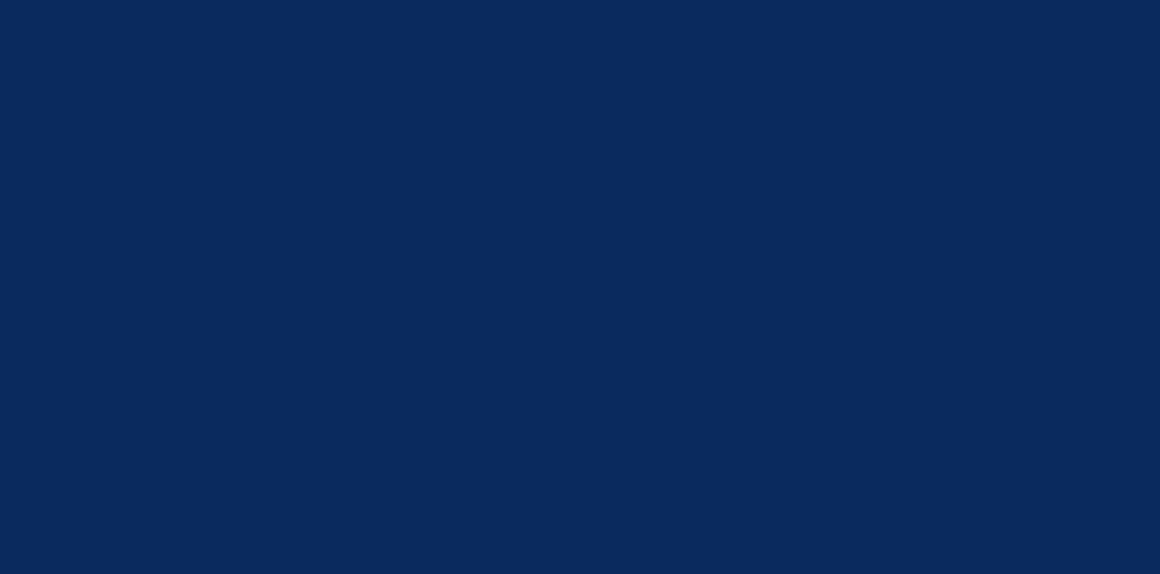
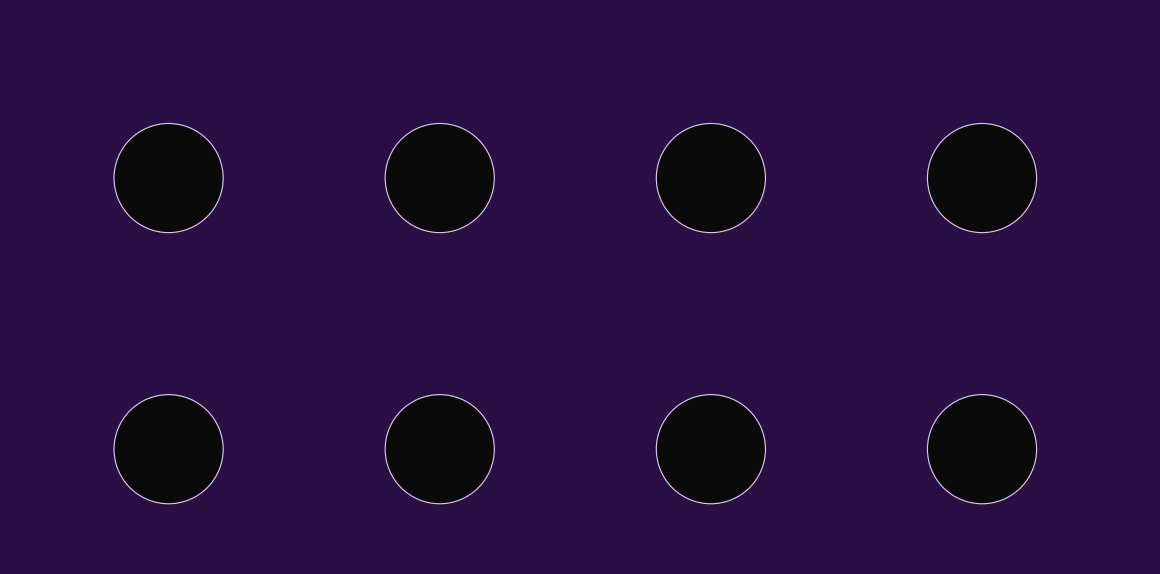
part: none -> (168, 178)
part: none -> (439, 178)
part: none -> (710, 178)
part: none -> (982, 178)
part: none -> (168, 449)
part: none -> (439, 449)
part: none -> (710, 449)
part: none -> (982, 449)

